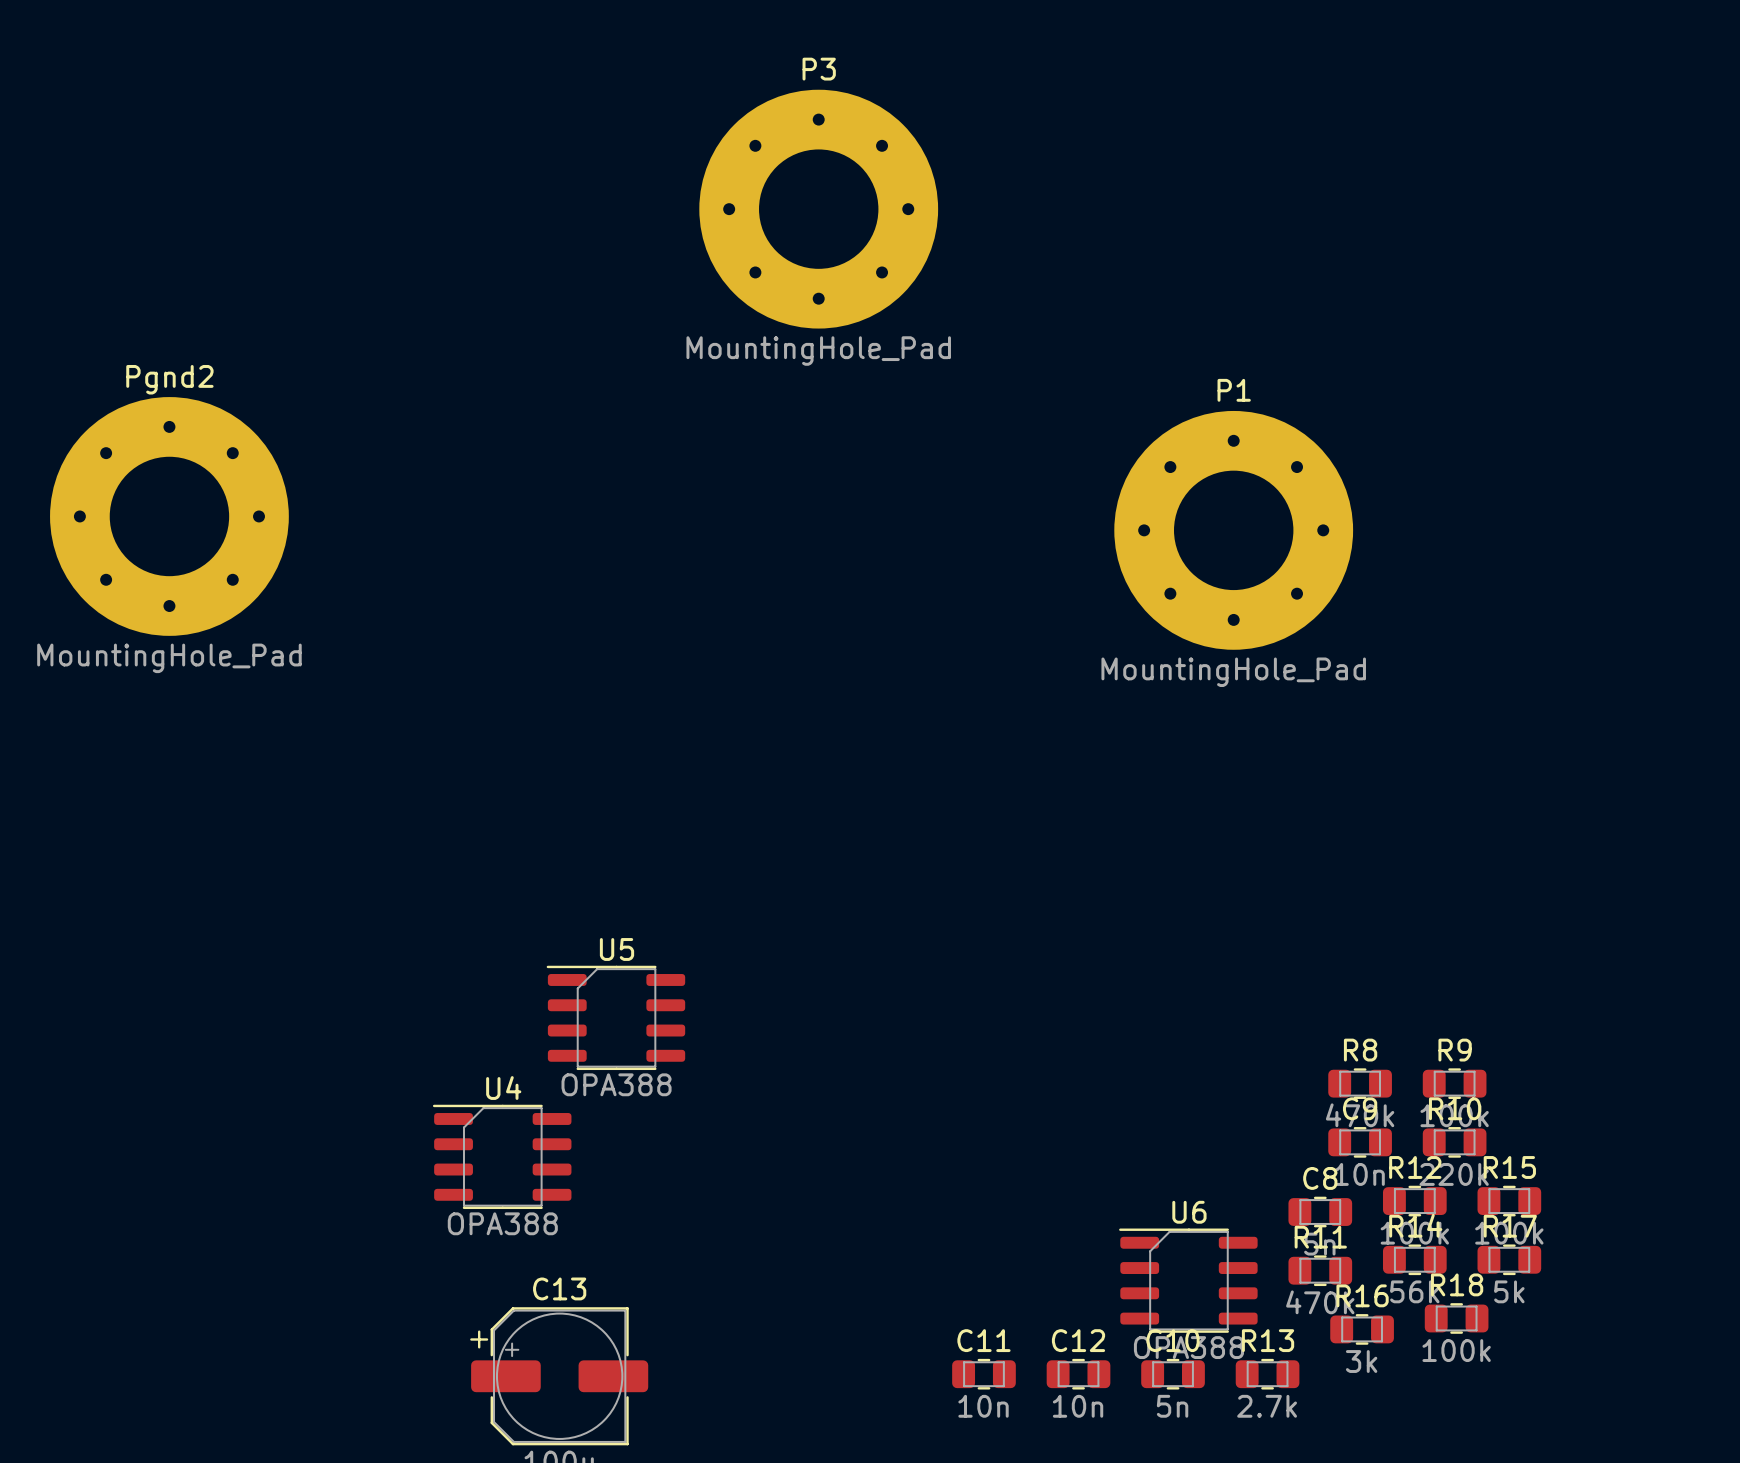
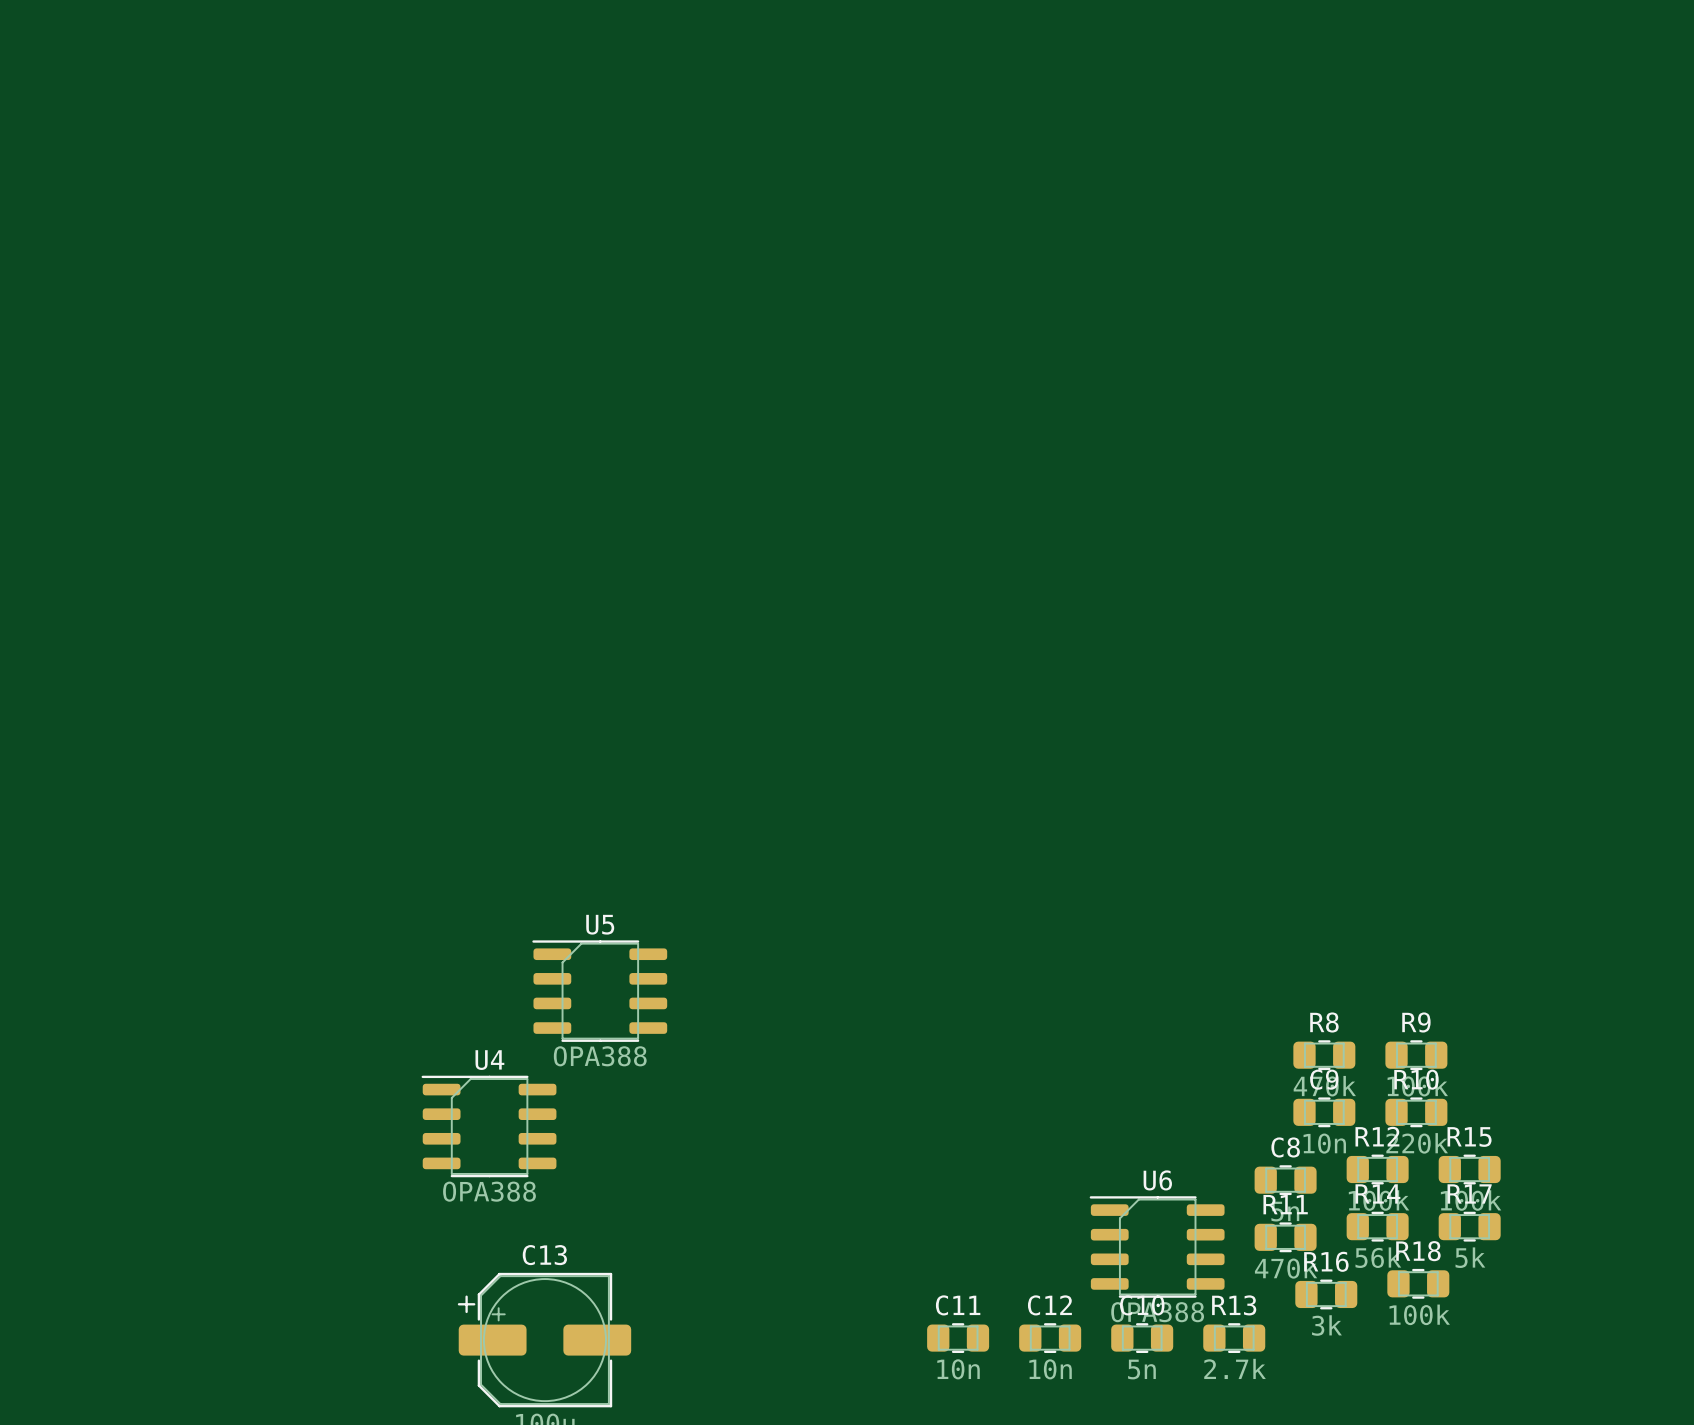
P3: MountingHole_Pad (818, 209) -> none
Pgnd2: MountingHole_Pad (169, 516) -> none
P1: MountingHole_Pad (1233, 530) -> none

